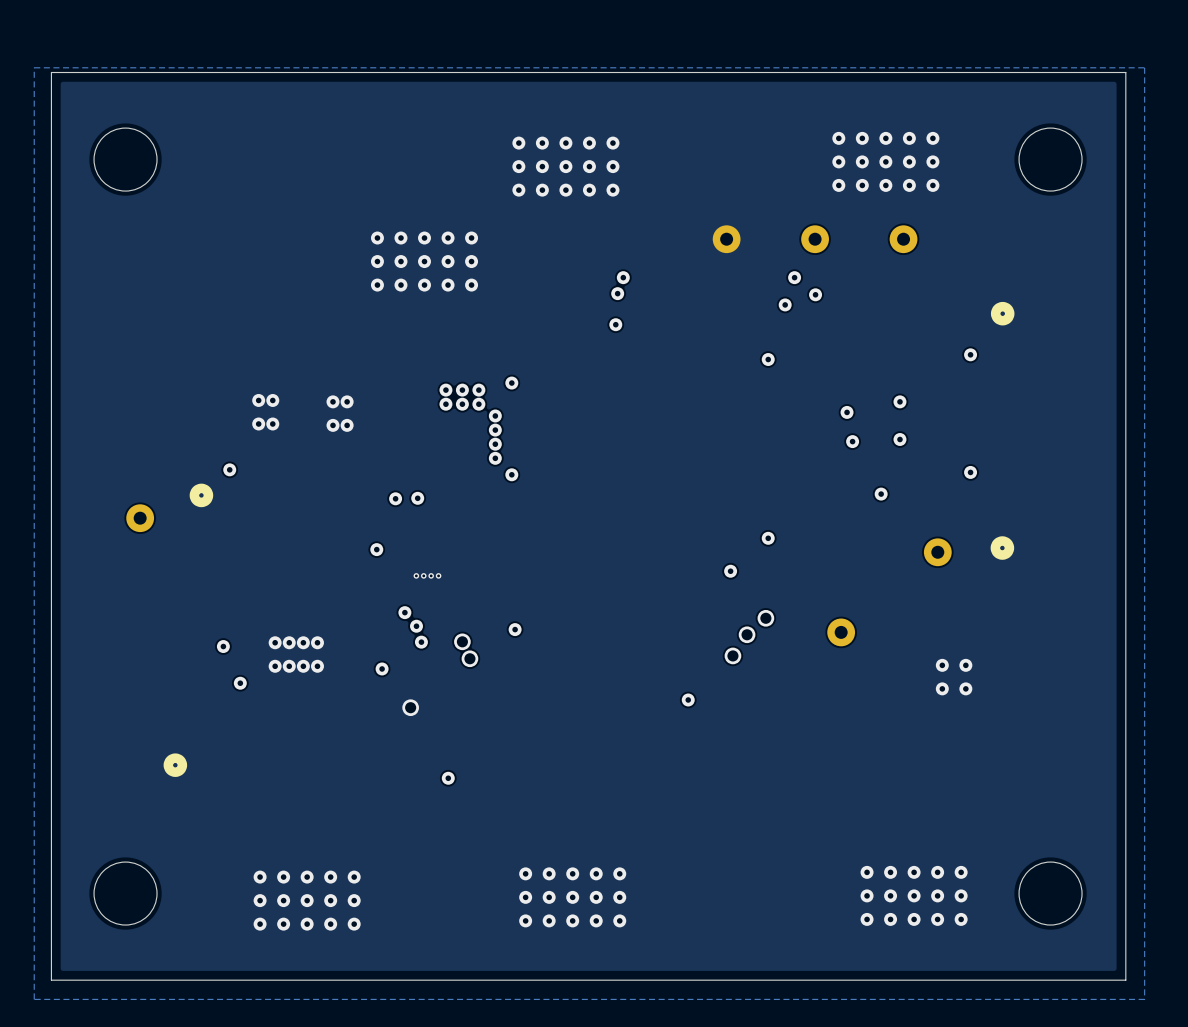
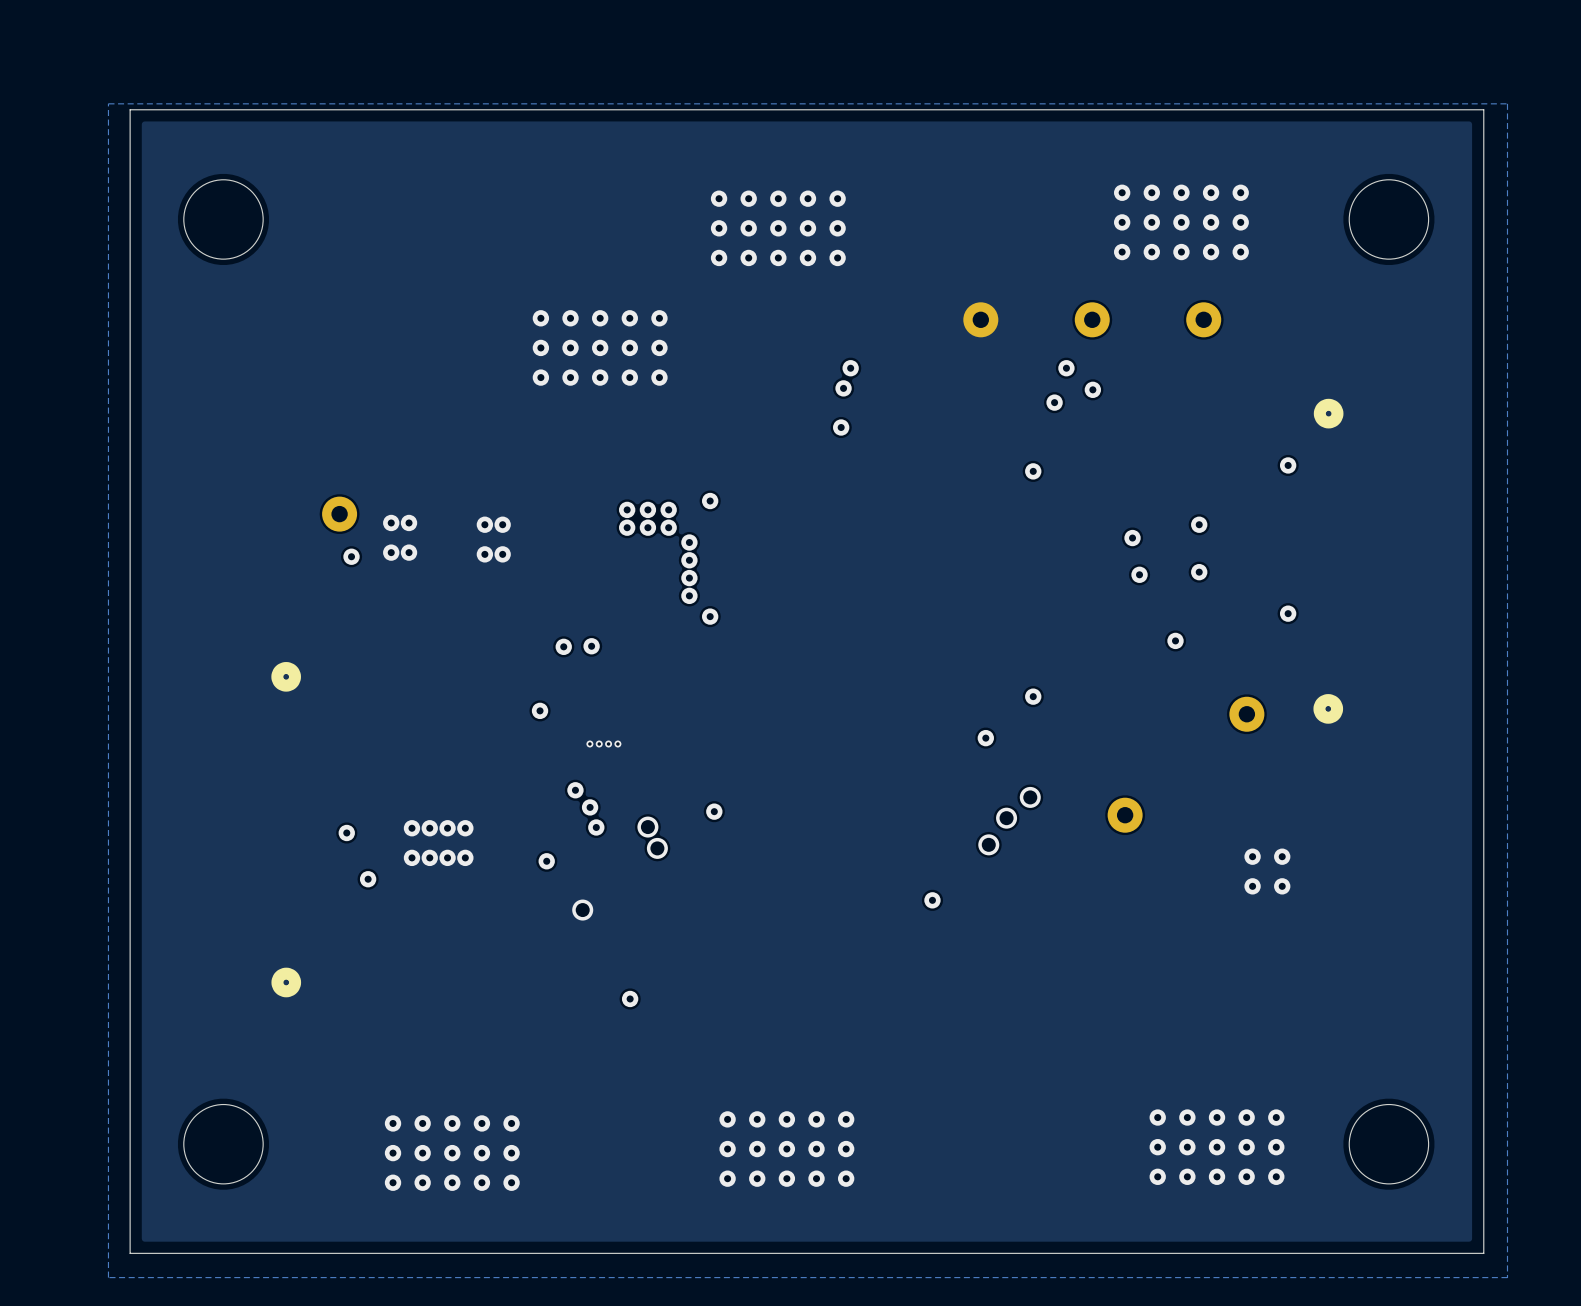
via position: (229, 469) -> (351, 556)
part position: (201, 495) -> (286, 676)
part position: (140, 518) -> (339, 514)

